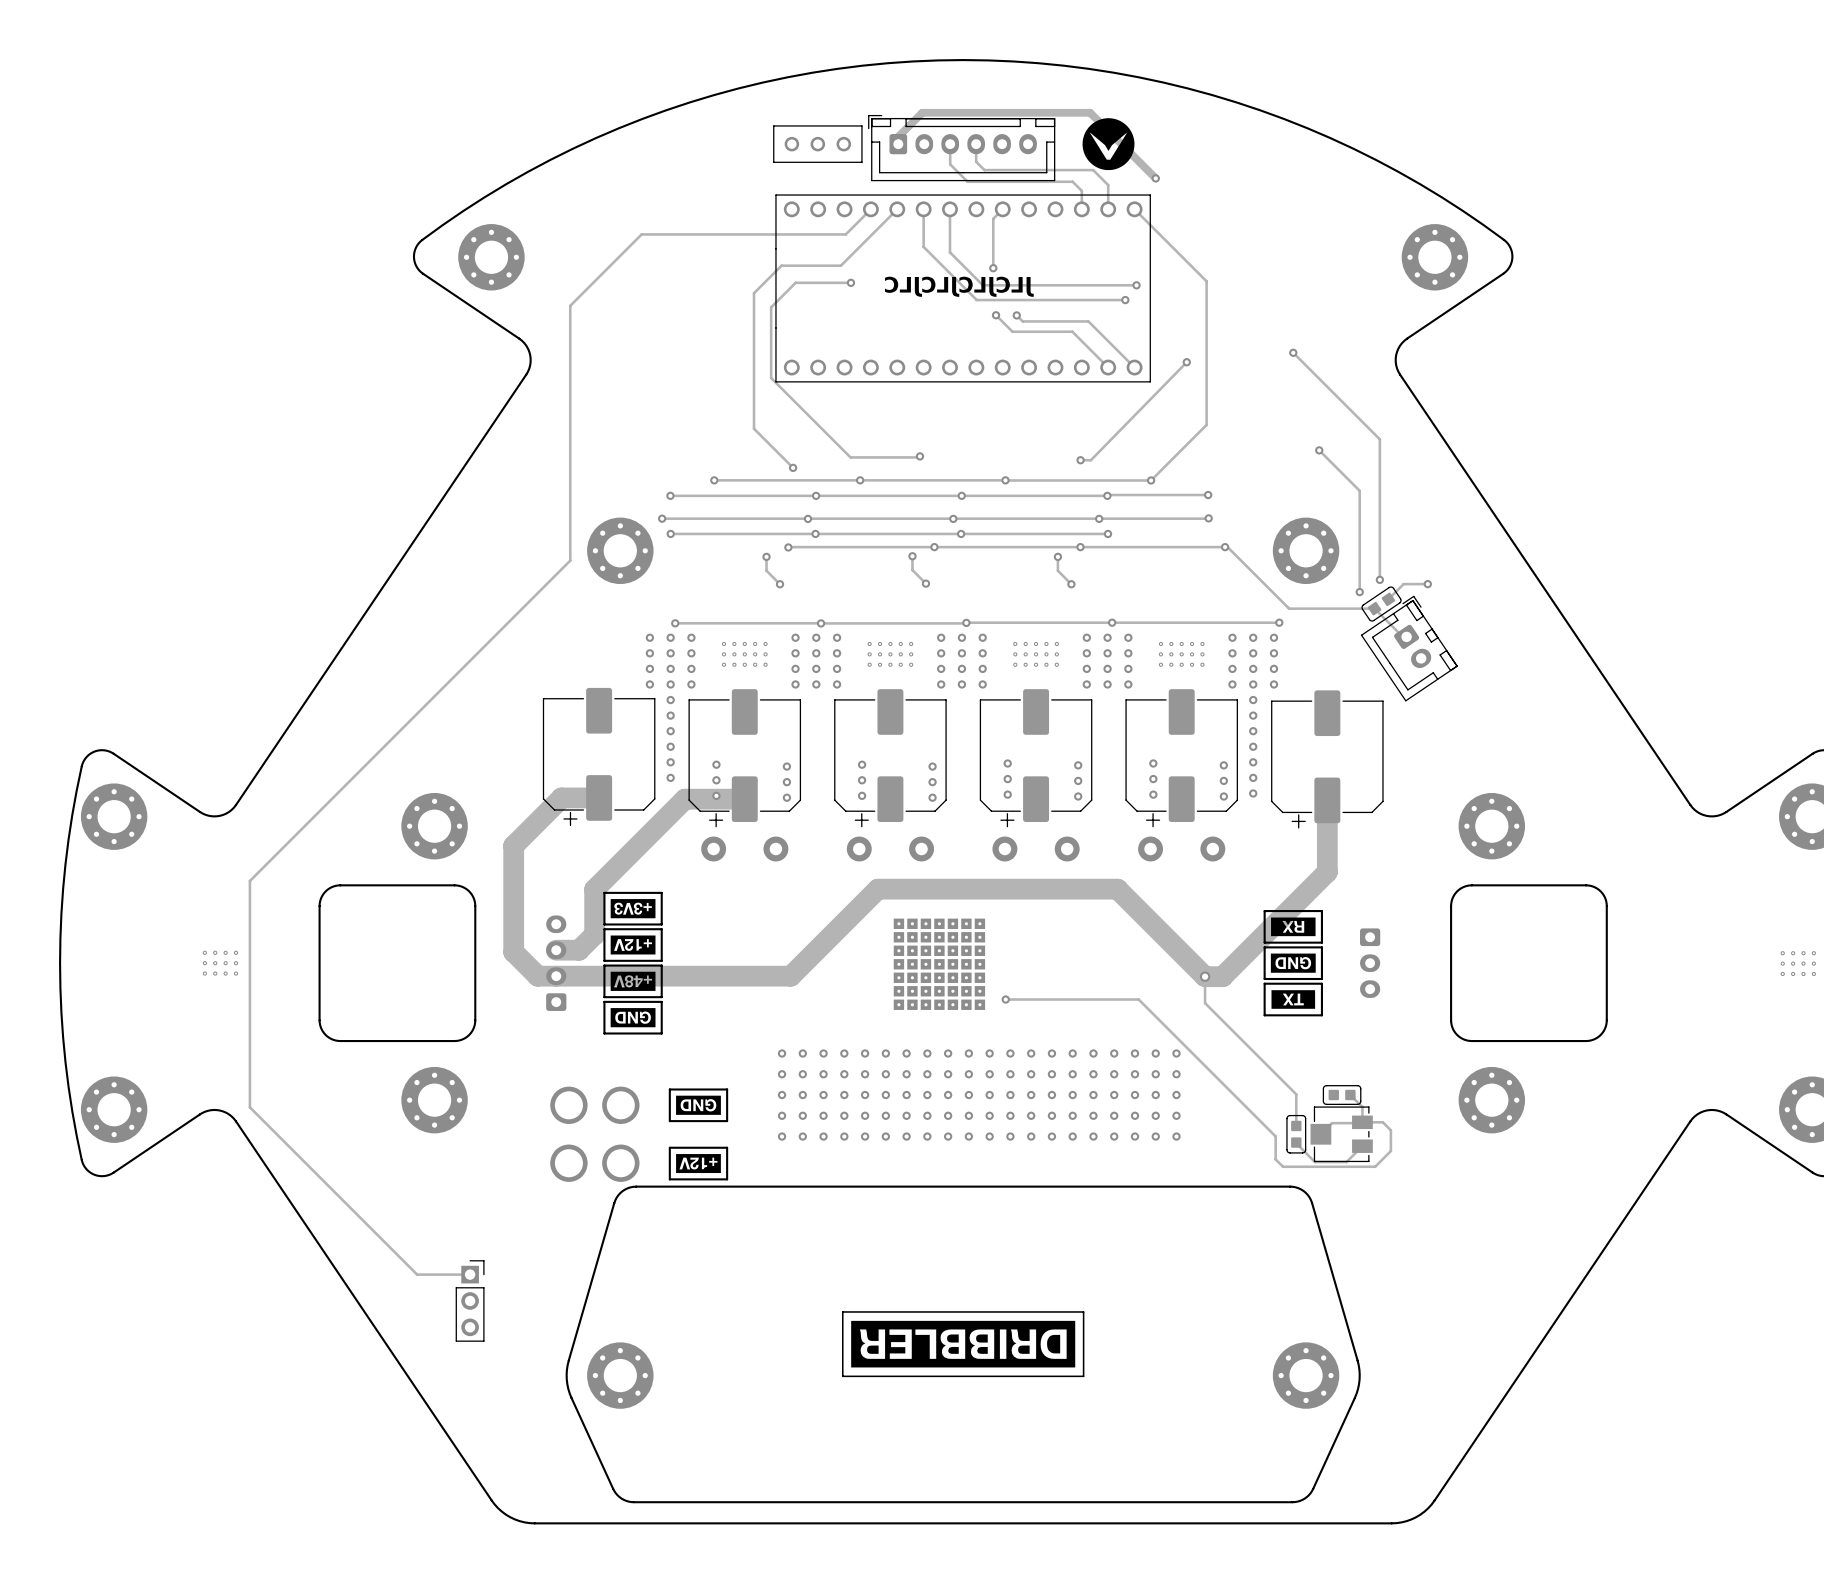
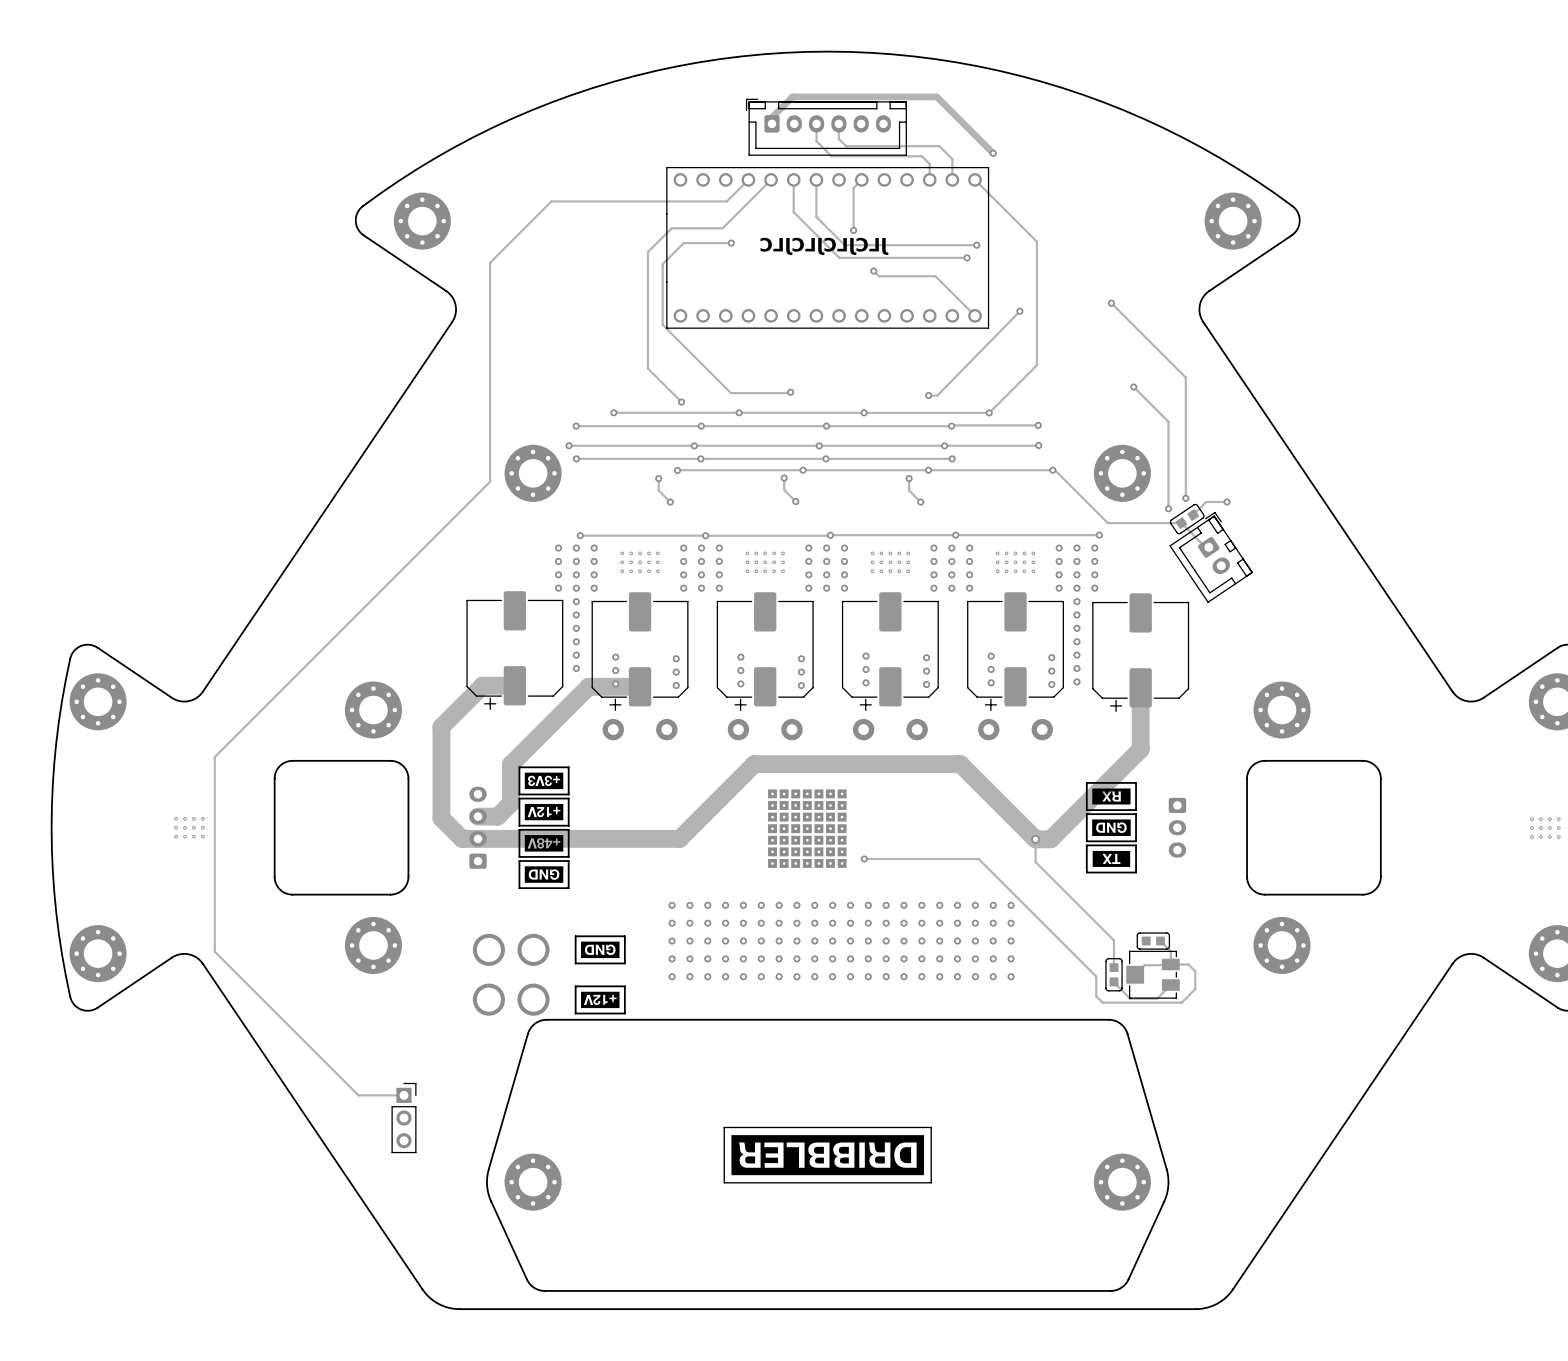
drawing: [1082, 118, 1135, 171] -> none
part: (817, 144) -> none
track: (996, 315) (1012, 331) (1072, 331) (1108, 367) -> none
via: (996, 315) -> none

